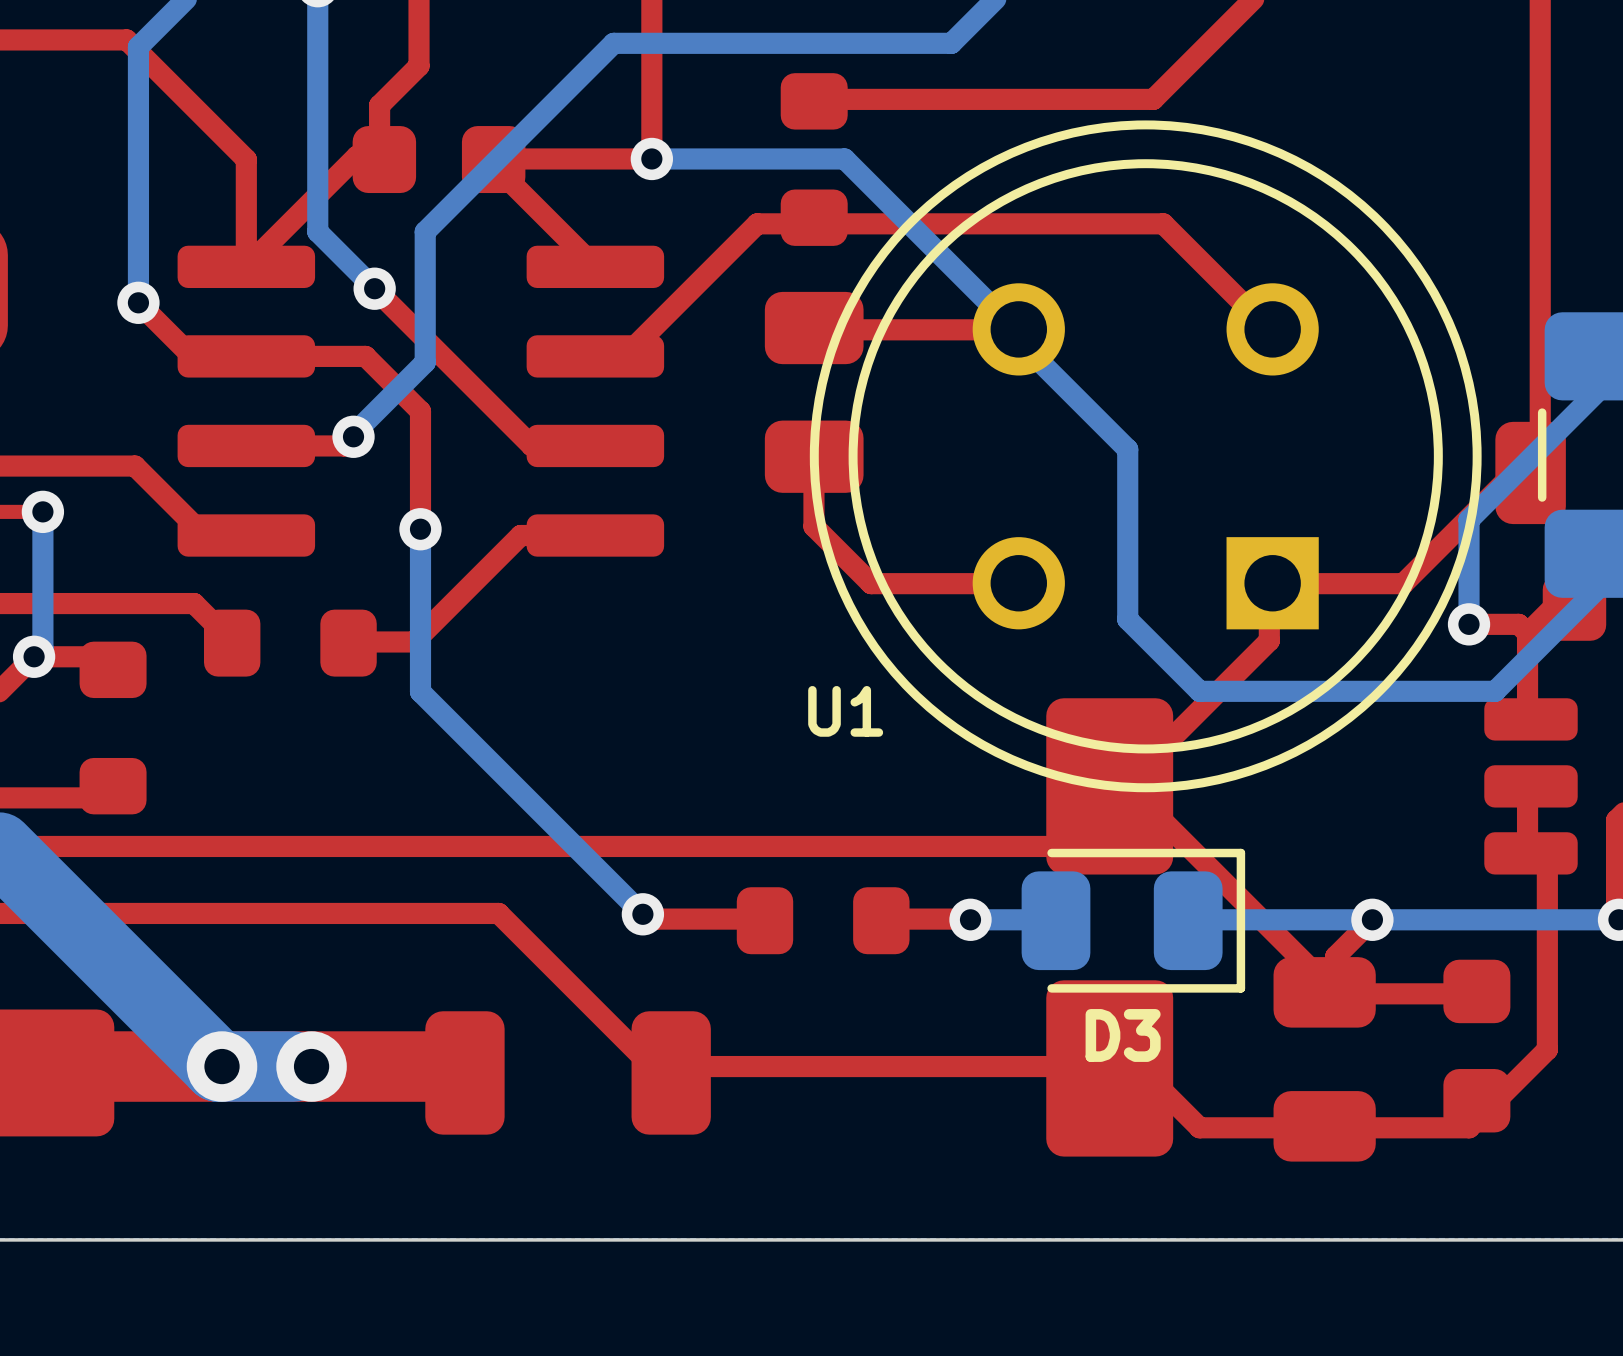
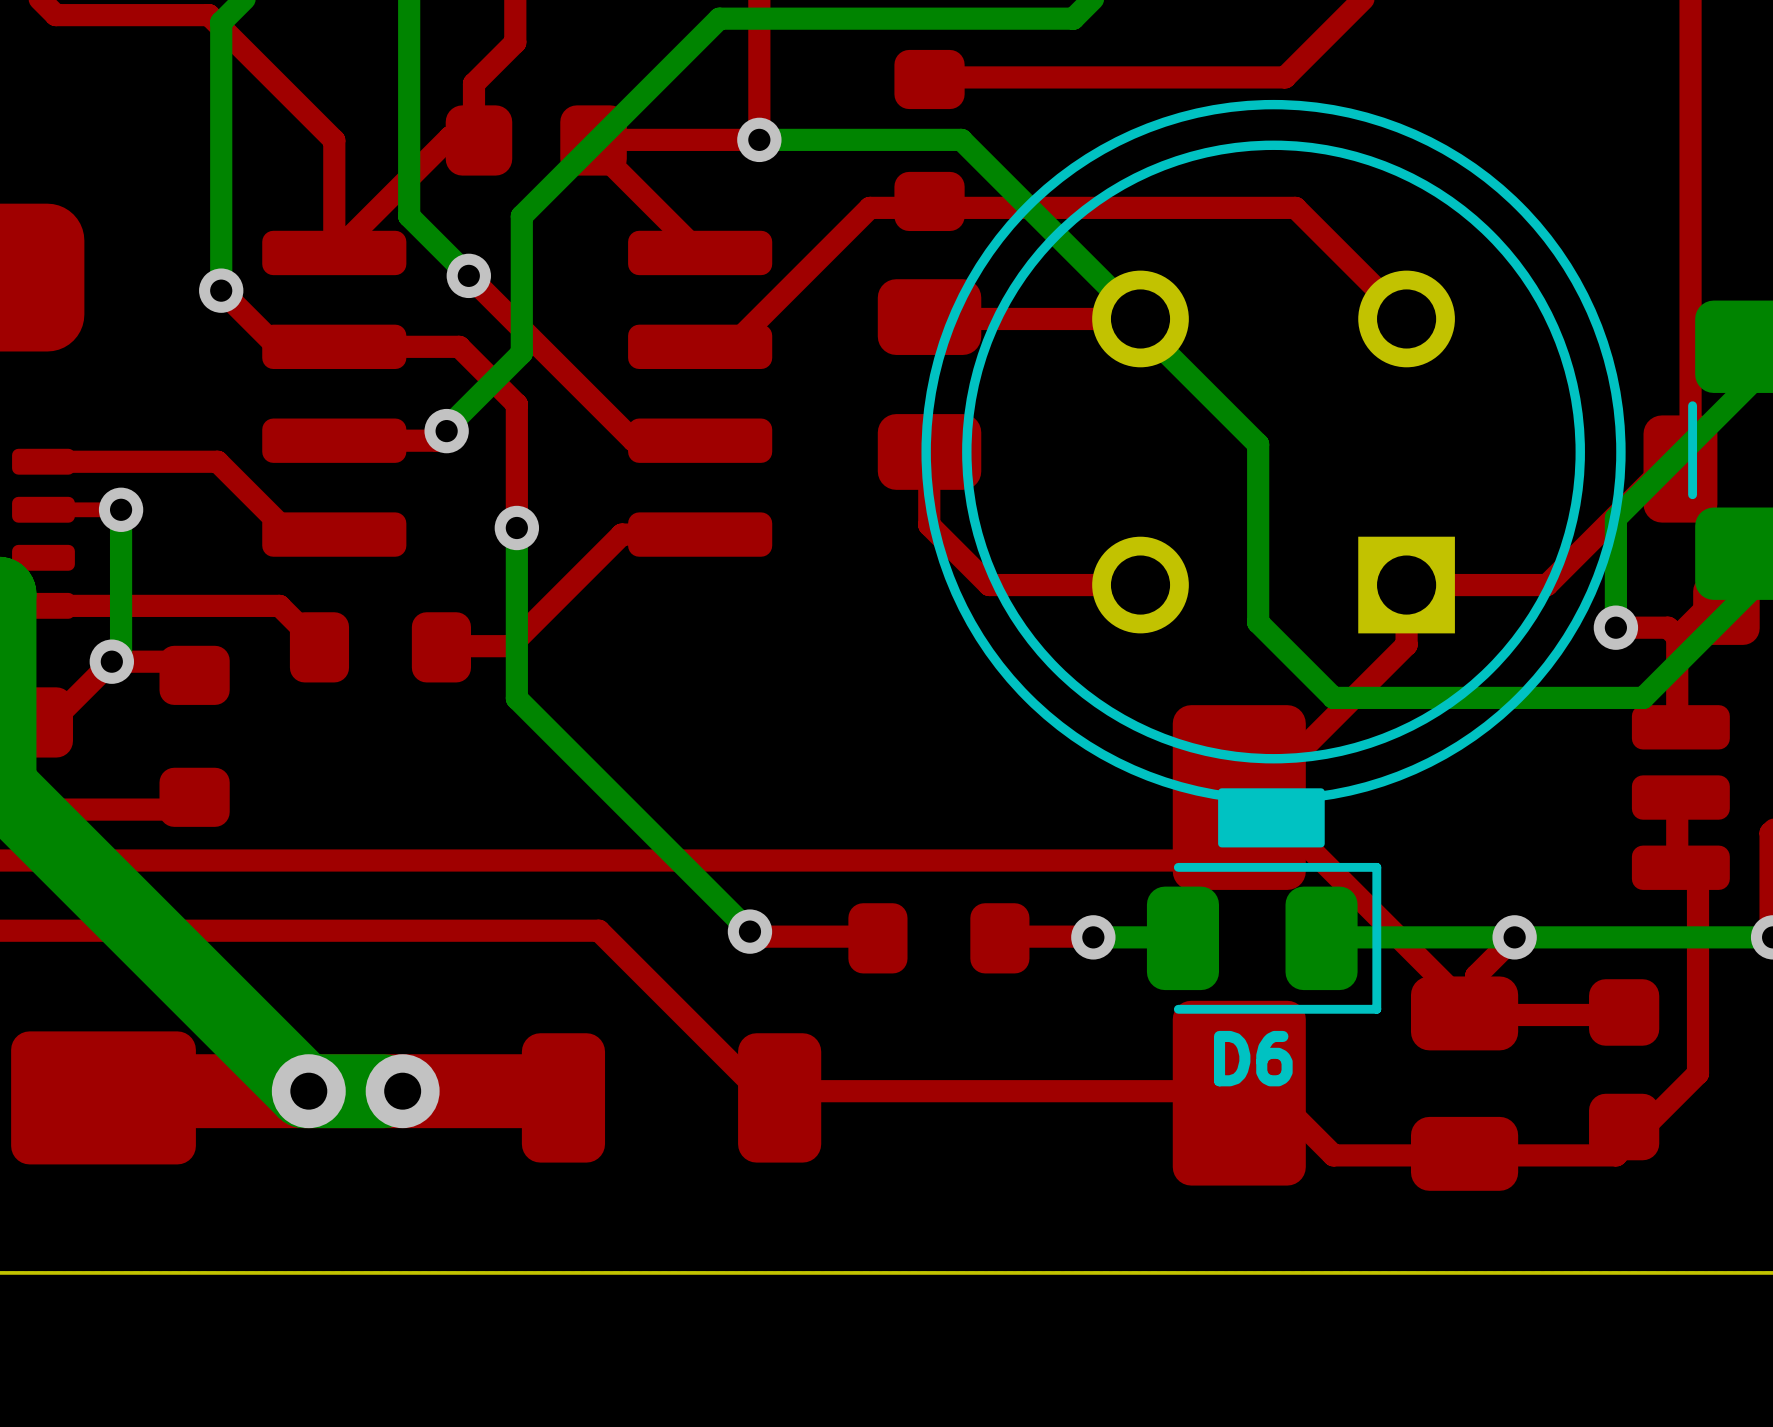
U1: (1145, 456) -> none
part: none -> (1273, 473)
D3 name: D3 (1123, 1035) -> D6 (1253, 1058)

